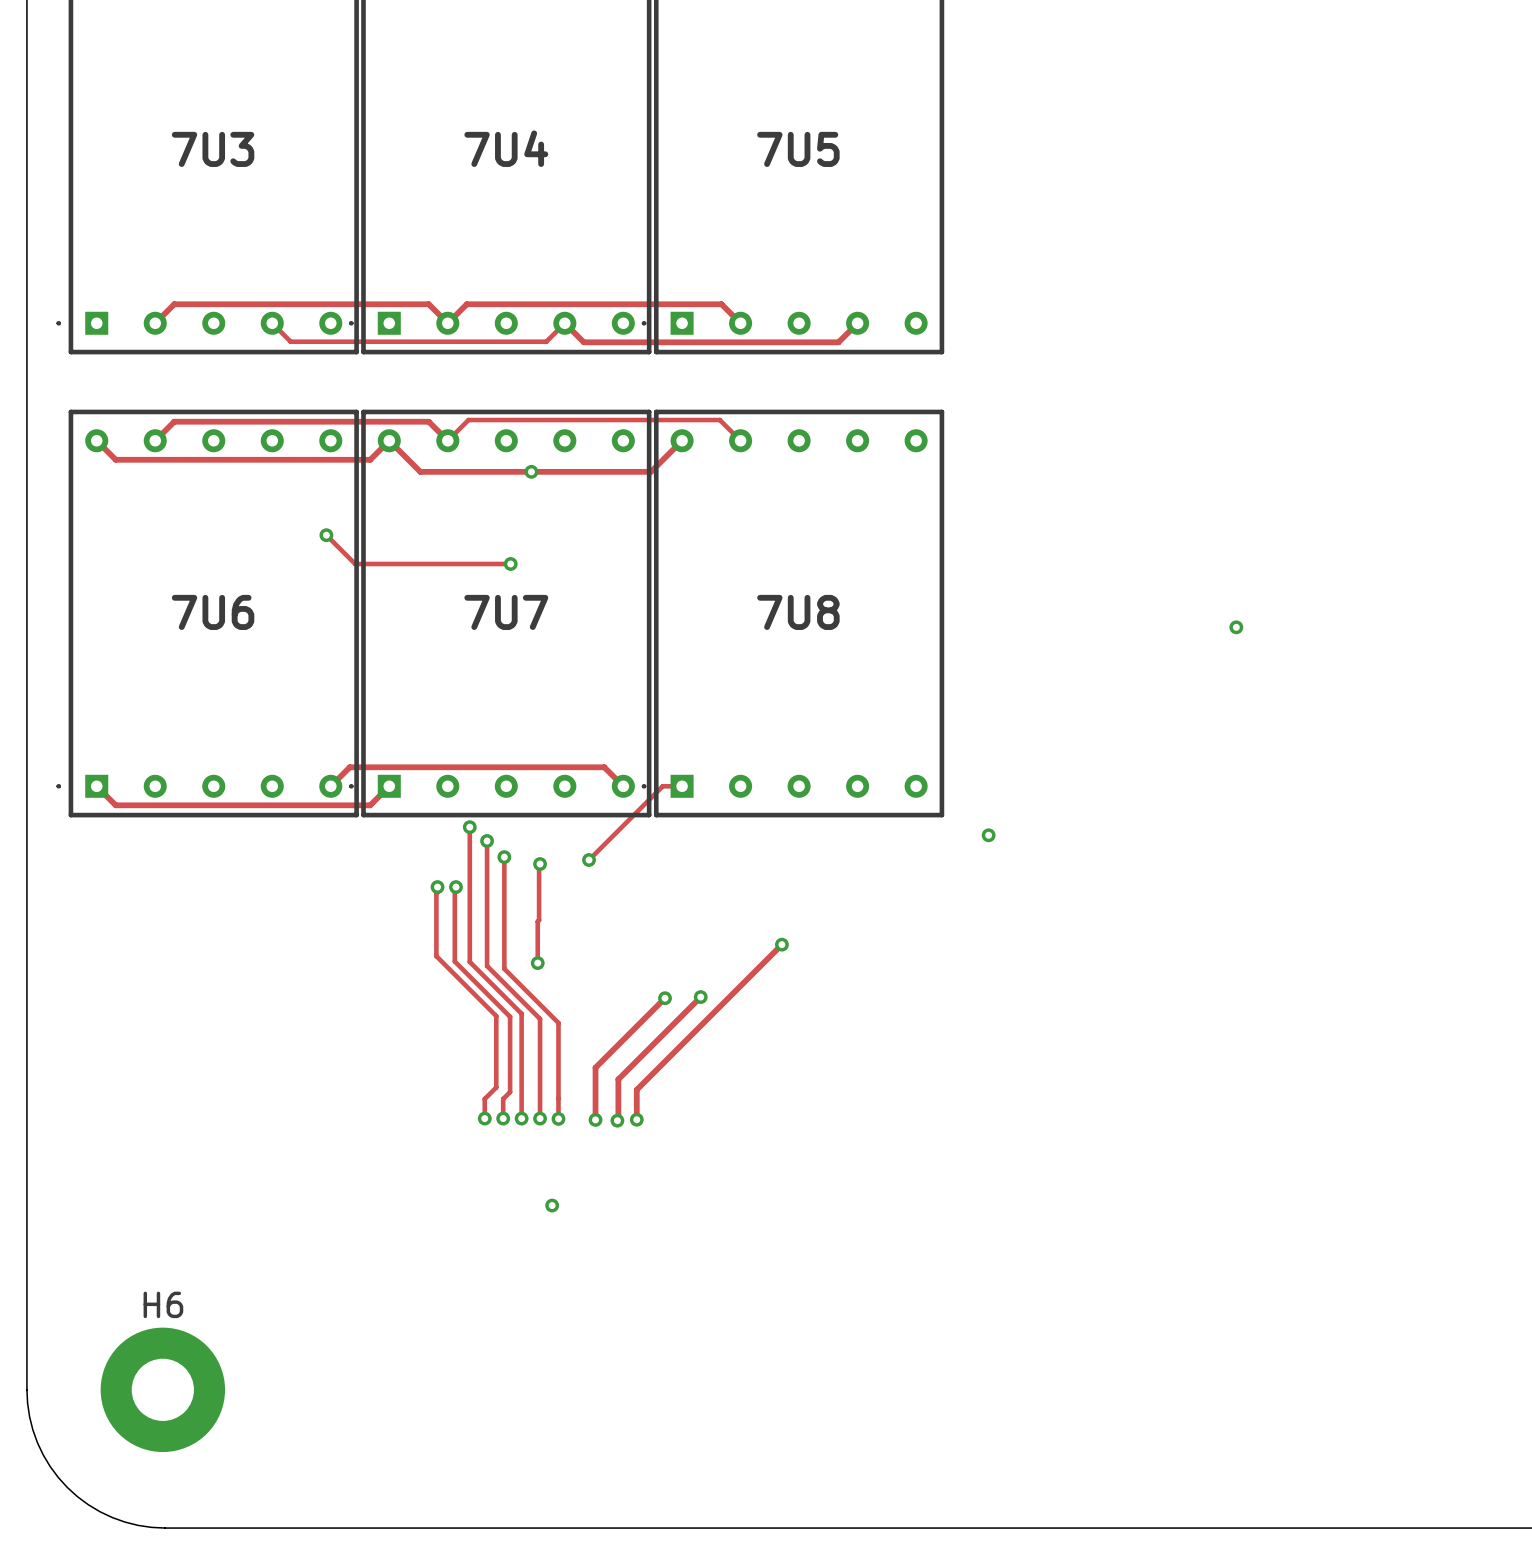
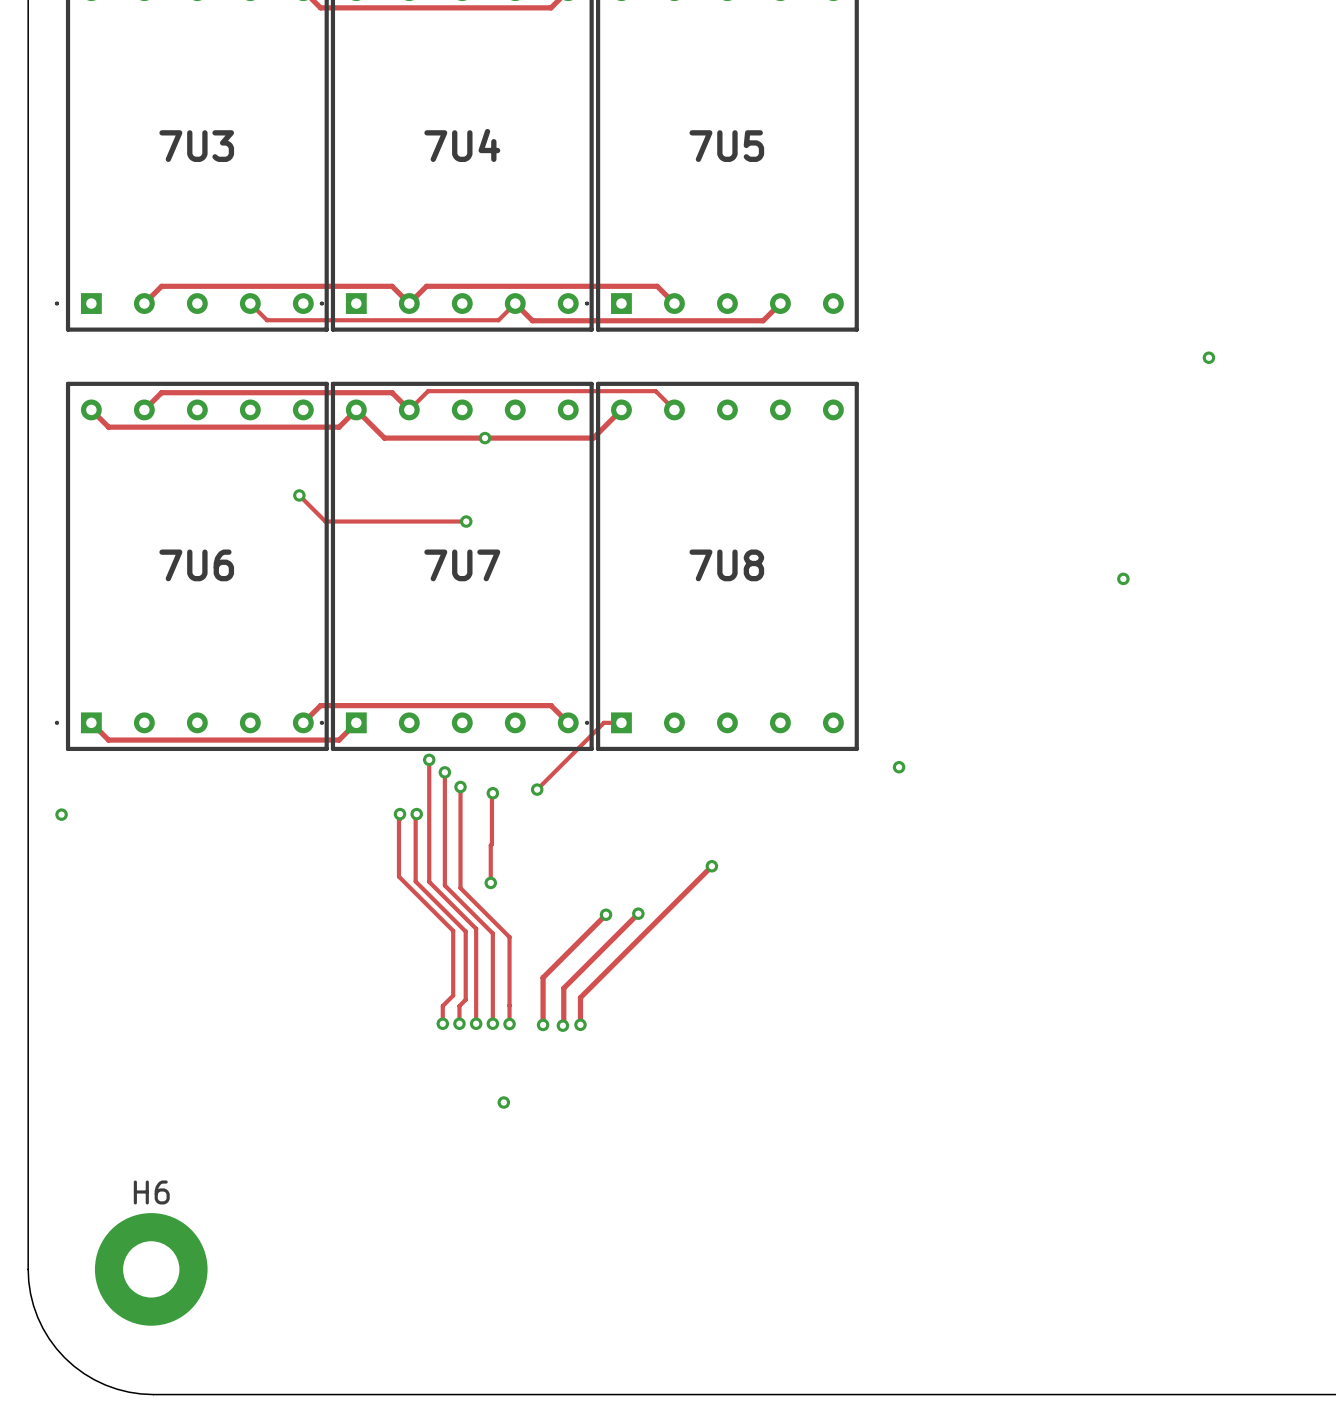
via: none -> (1208, 357)
via: none -> (61, 814)

